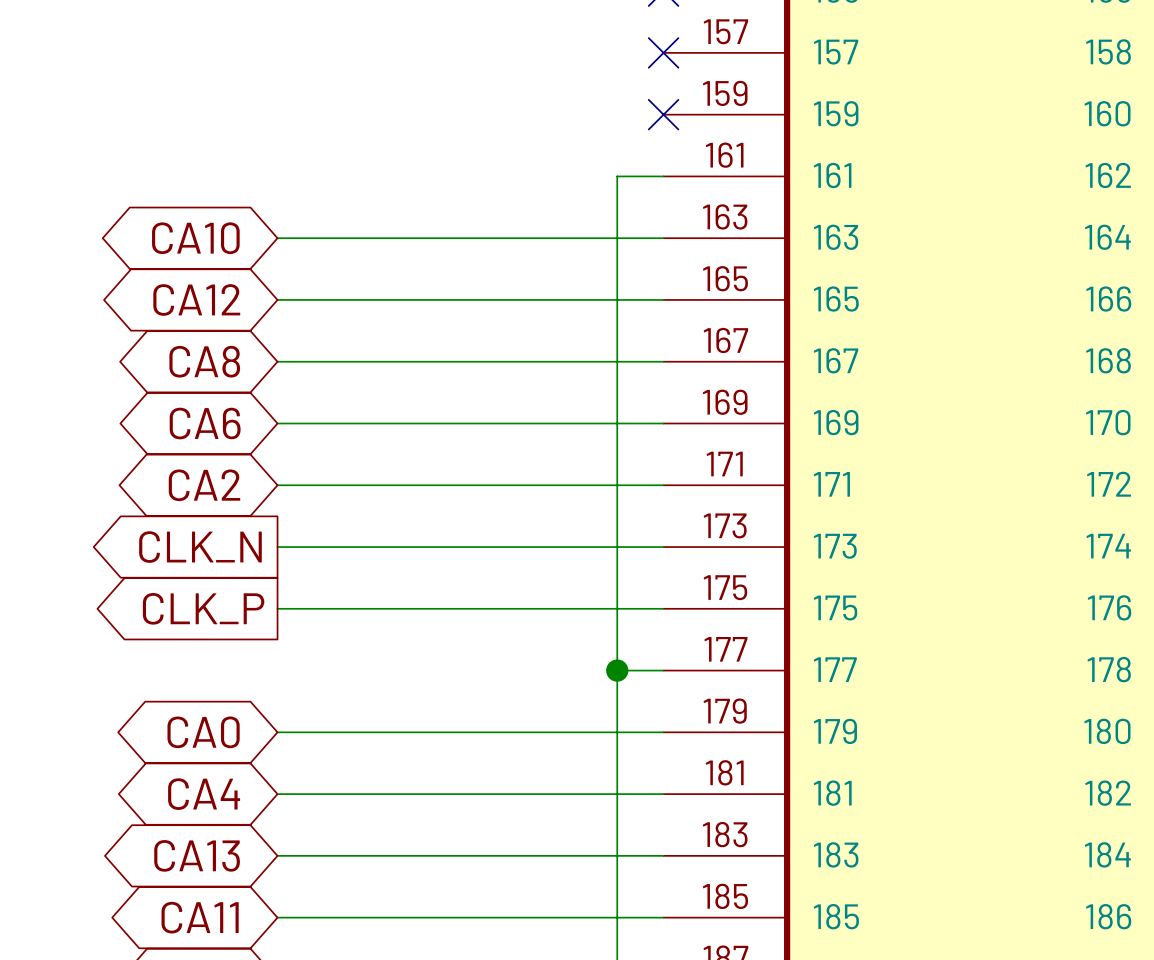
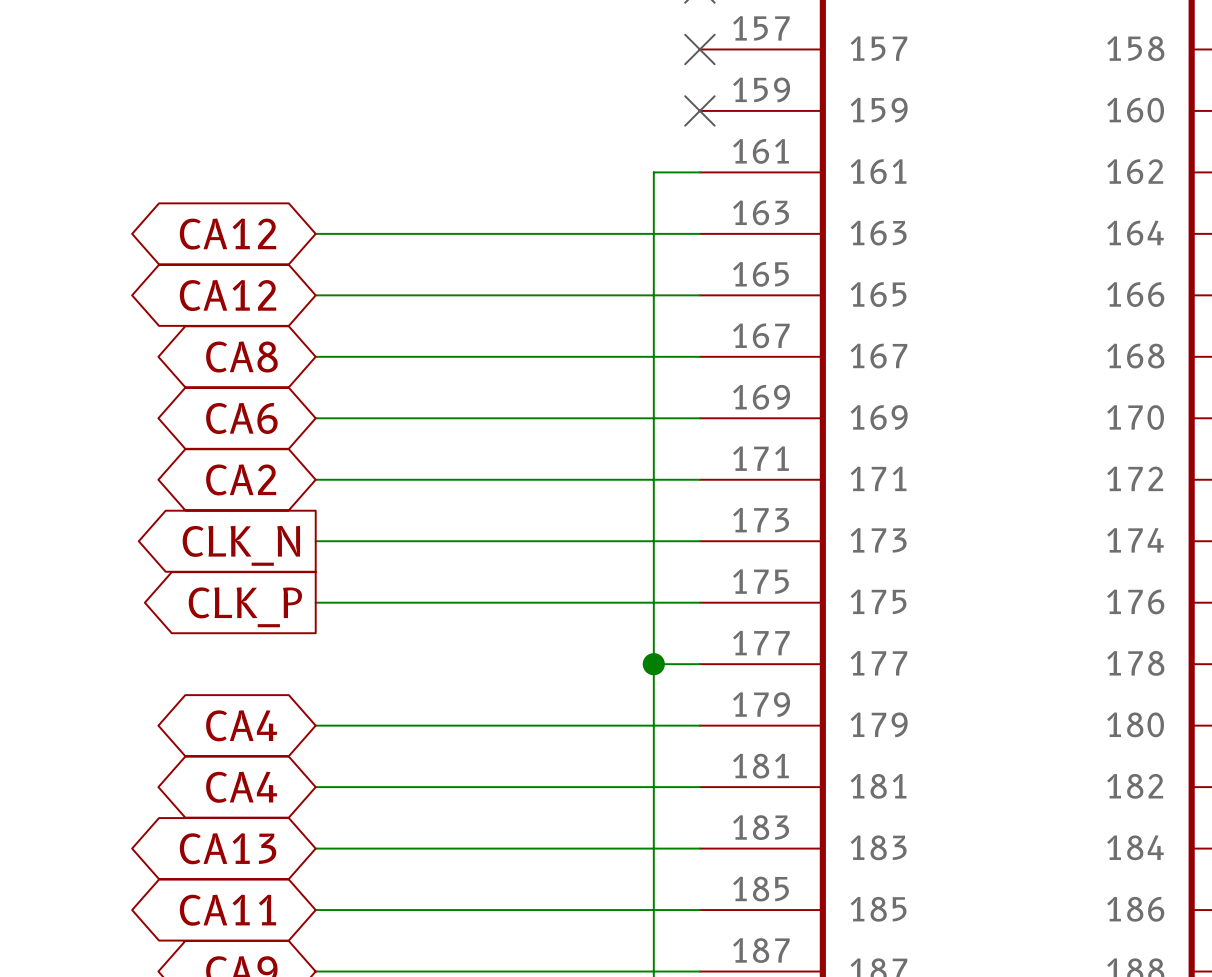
global label: CA10 (195, 238) -> CA12 (228, 234)
global label: CA0 (203, 732) -> CA4 (241, 725)

